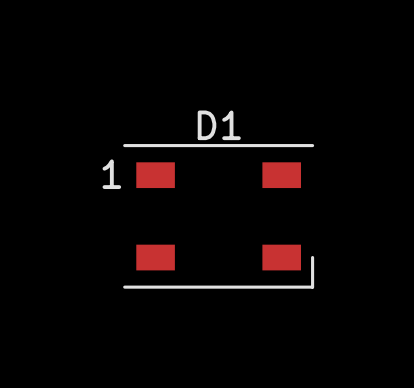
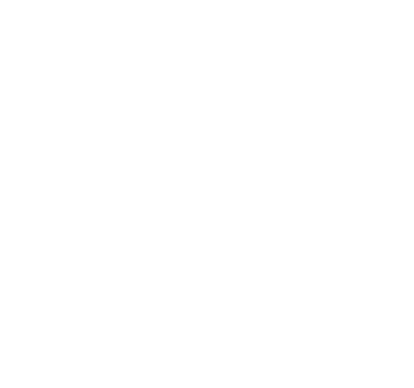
D1: (218, 216) -> none

